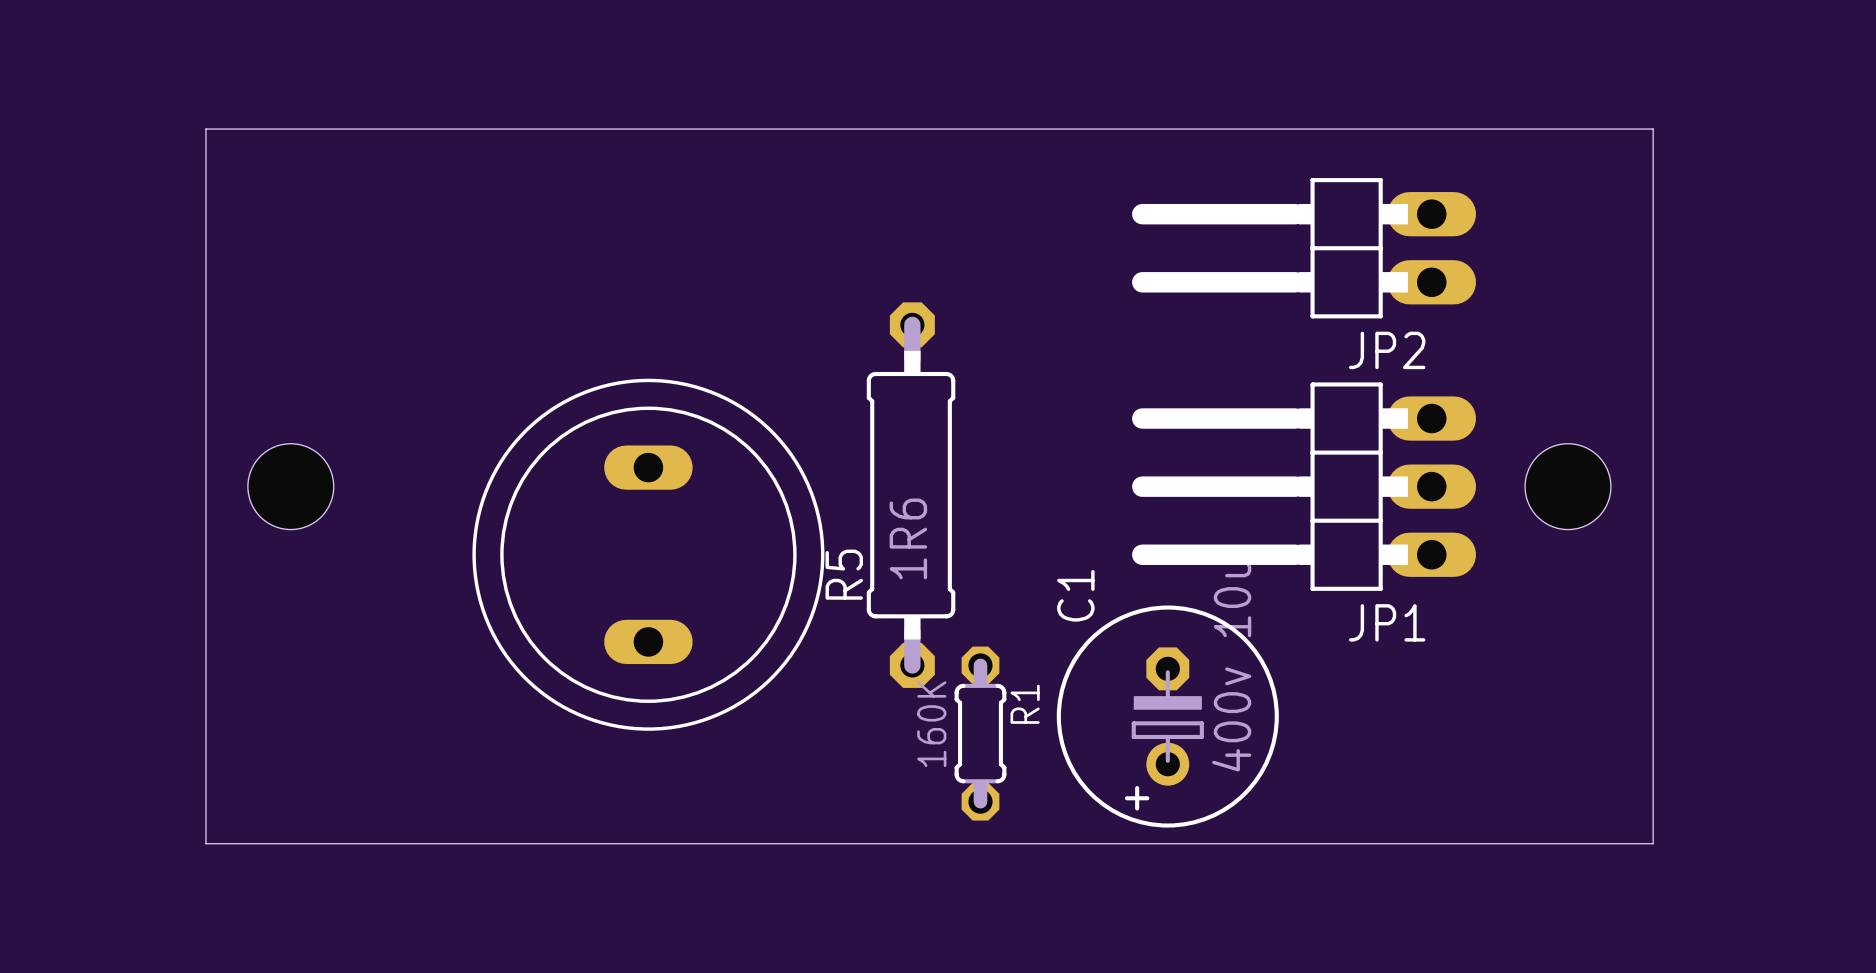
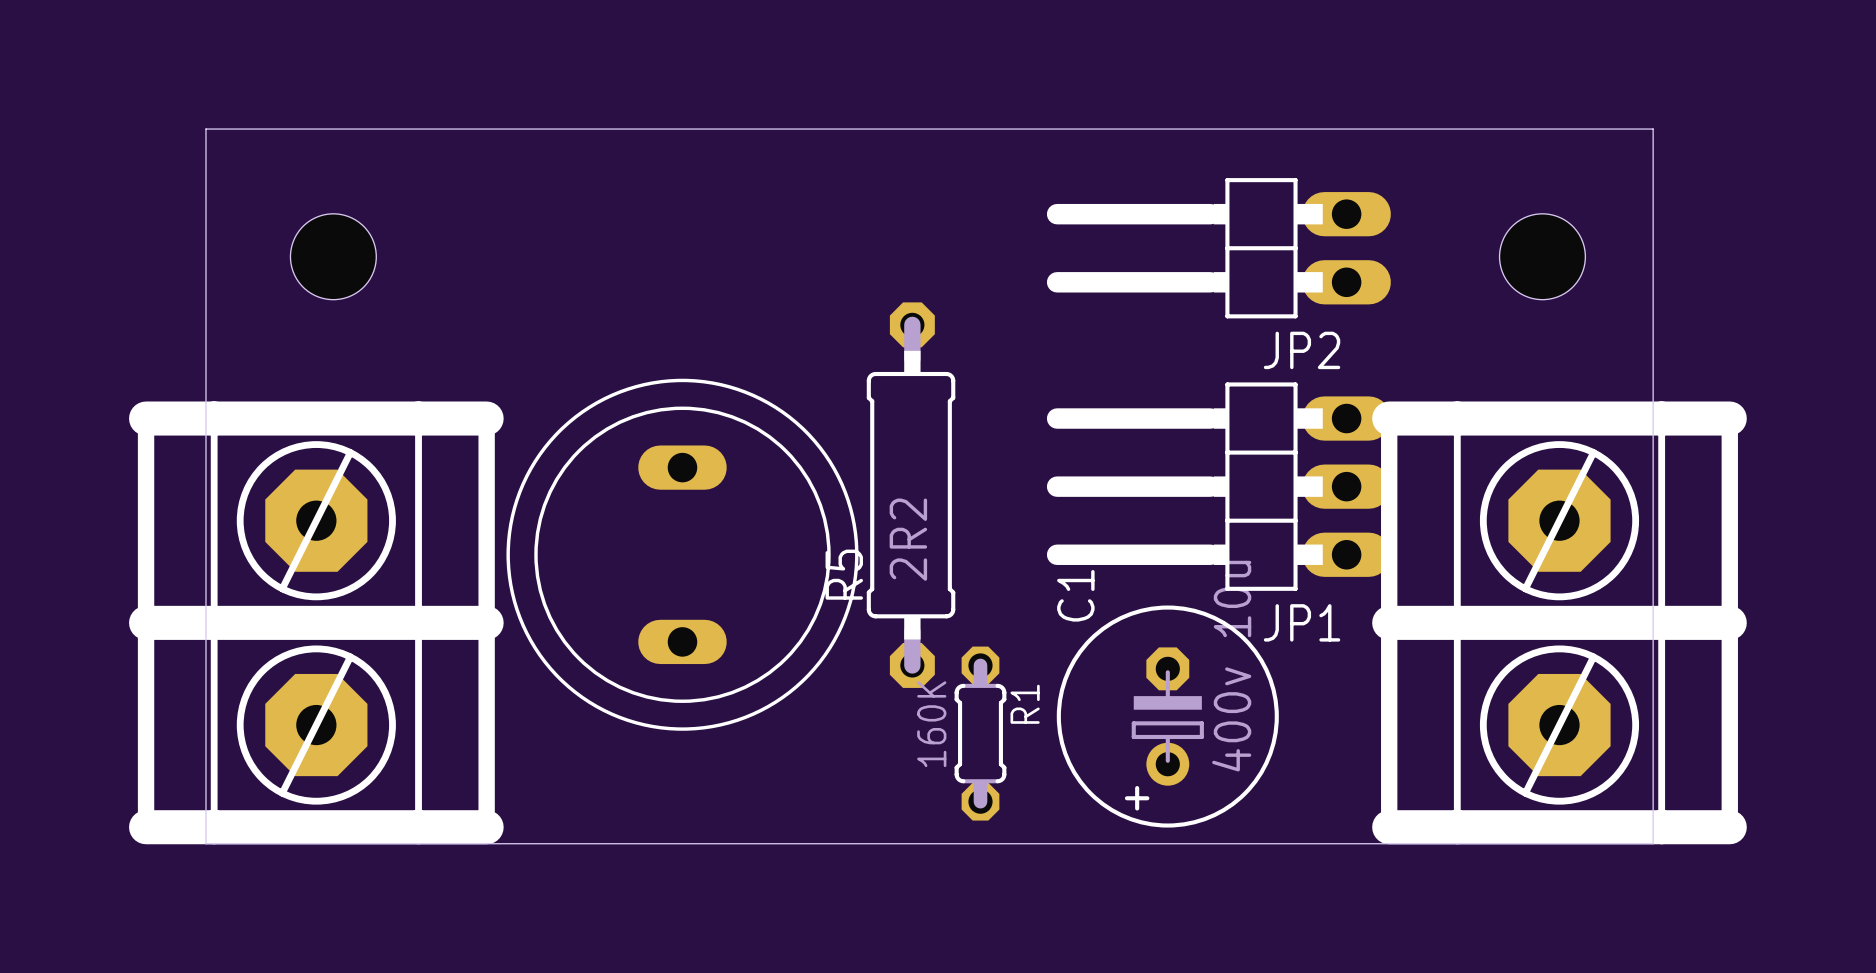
JP2 position: (1304, 248) -> (1218, 248)
hole position: (290, 486) -> (333, 256)
JP1 position: (1304, 486) -> (1218, 486)
hole position: (1568, 486) -> (1542, 256)
R5 value: 1R6 (908, 538) -> 2R2 (908, 539)
part position: (648, 554) -> (682, 554)
part: none -> (316, 622)
part: none -> (1559, 622)

